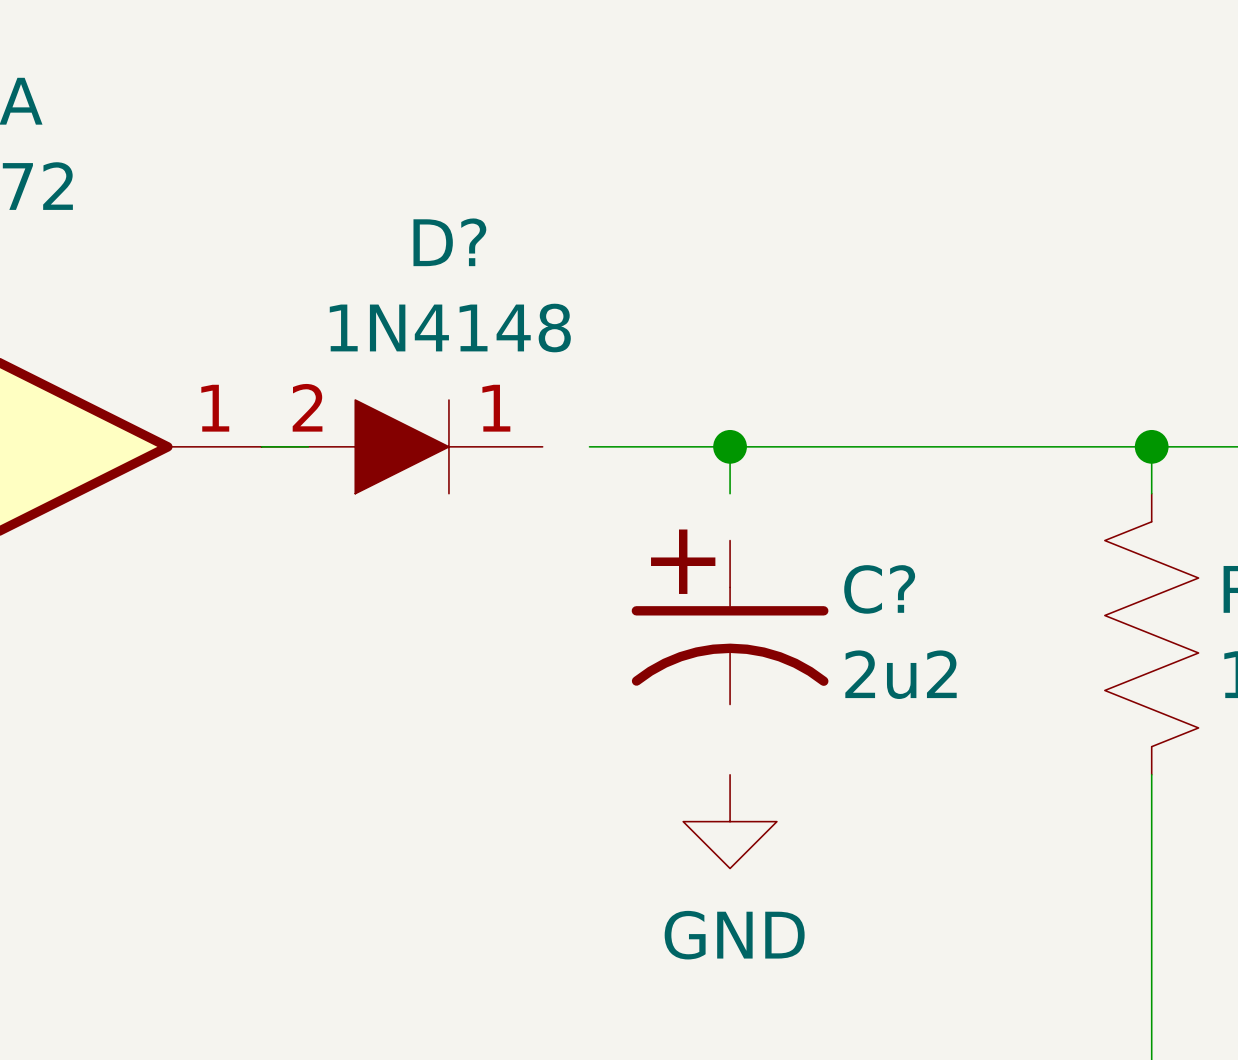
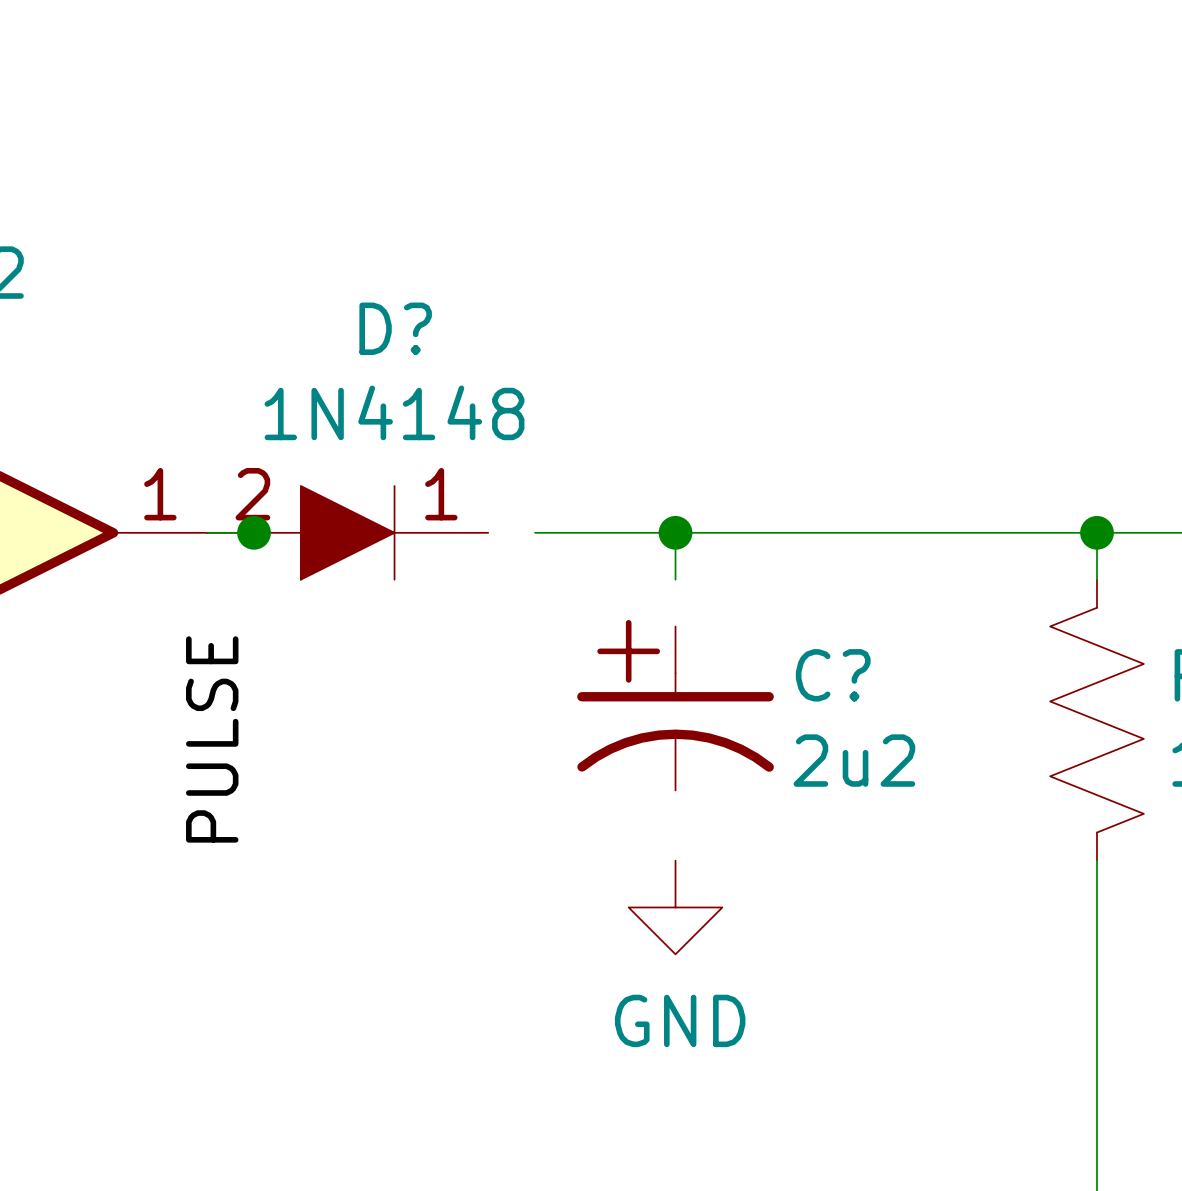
junction: none -> (254, 532)
label: none -> PULSE (212, 739)

